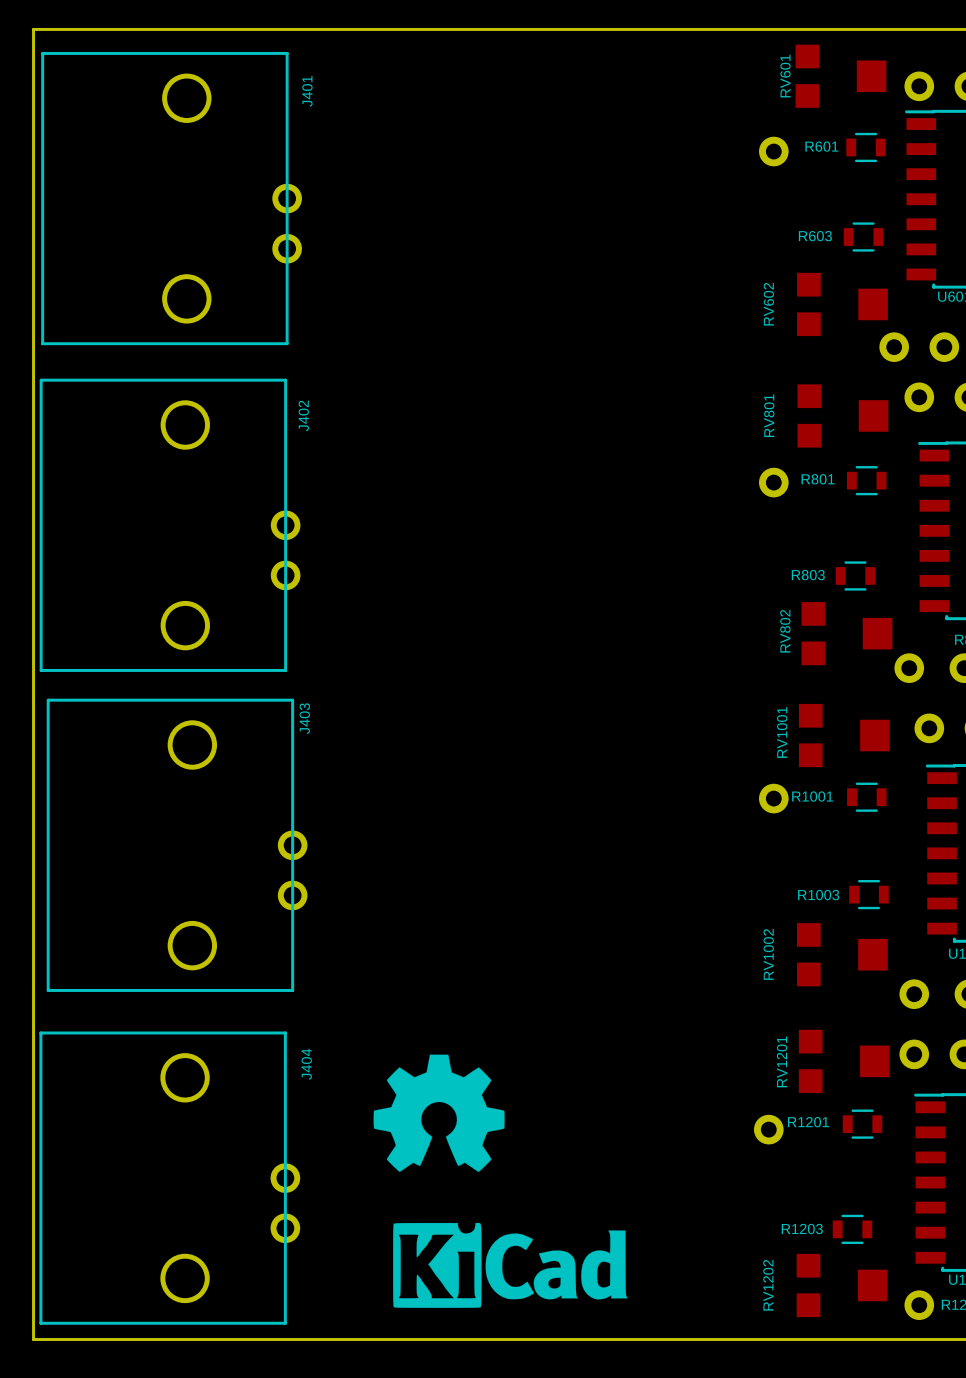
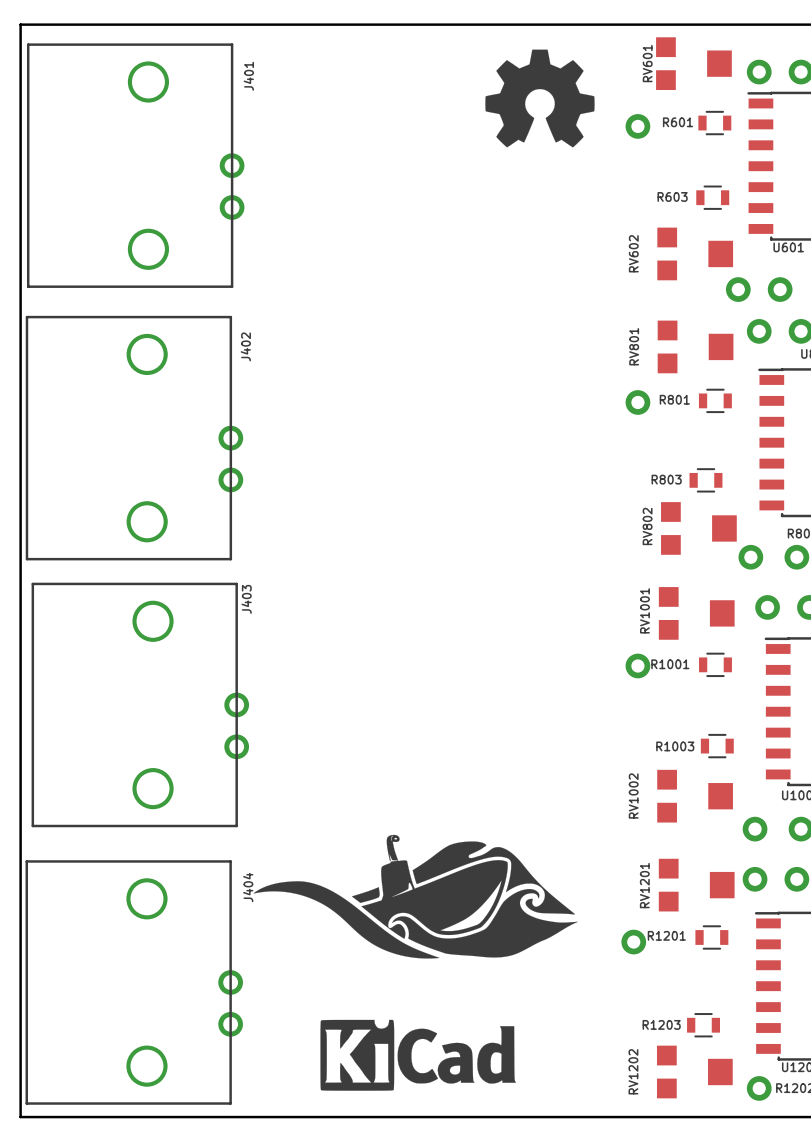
drawing: none -> [485, 49, 595, 148]
drawing: none -> [253, 834, 578, 959]
drawing: [373, 1054, 505, 1172] -> none

